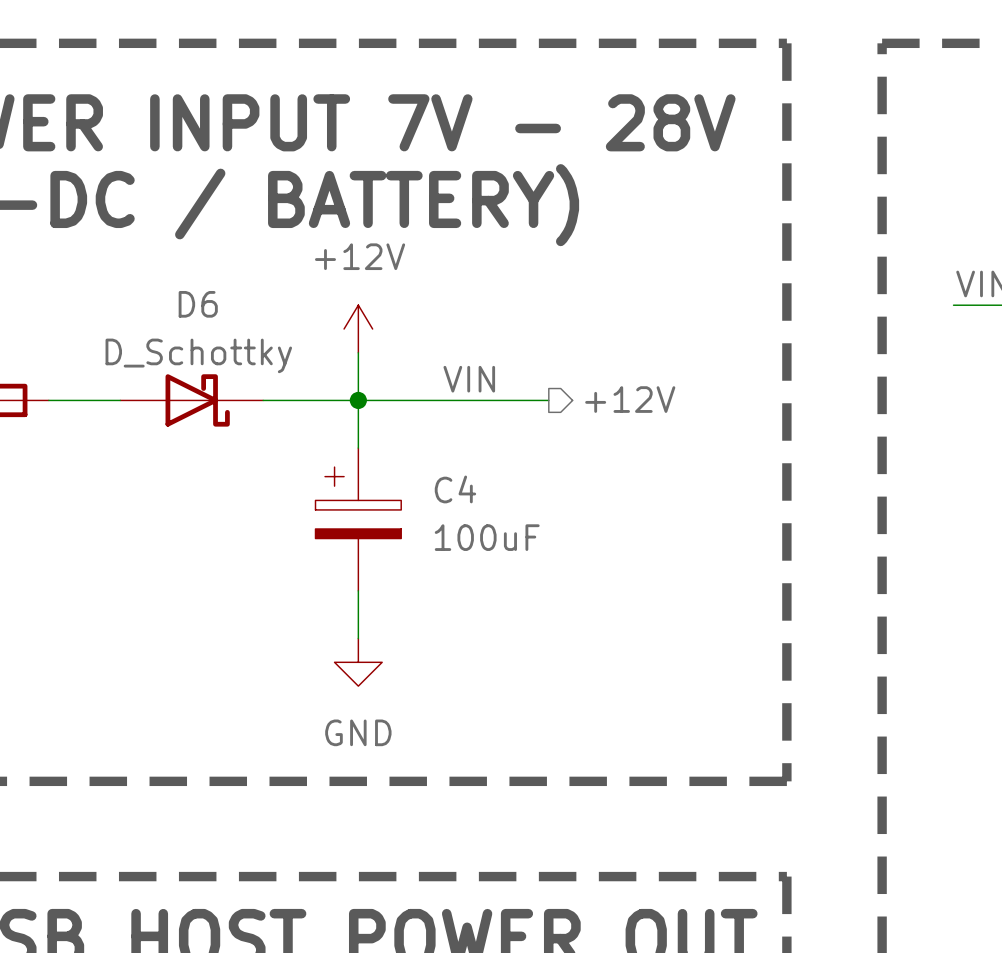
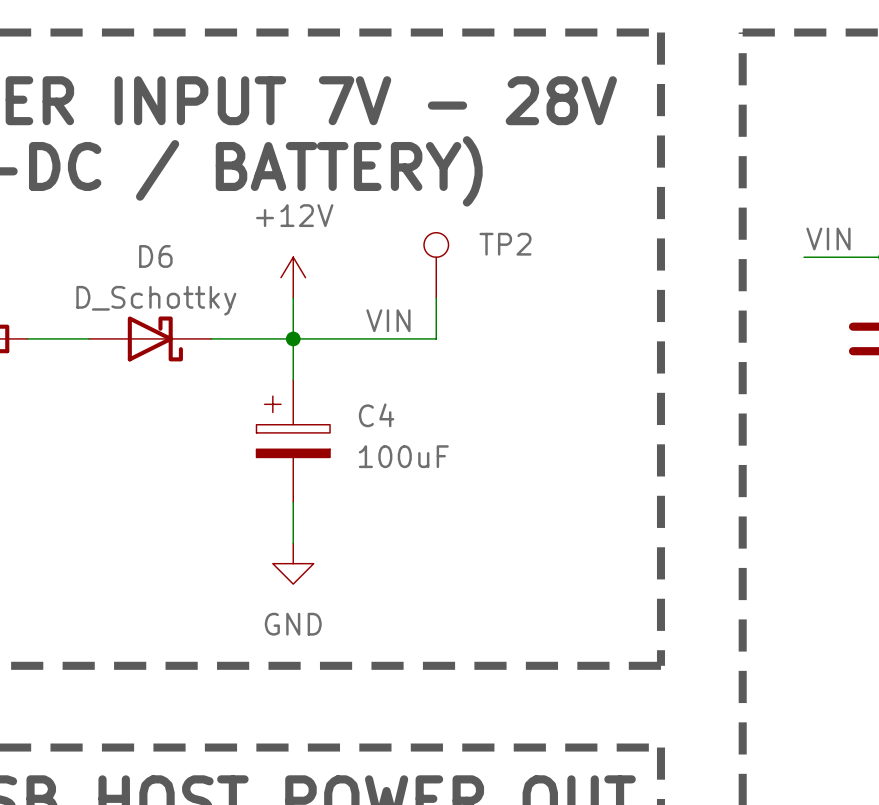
TP2: none -> (436, 265)
hierarchical label: +12V (630, 399) -> none
wire: (525, 400) (548, 400) -> (436, 338) (436, 298)

